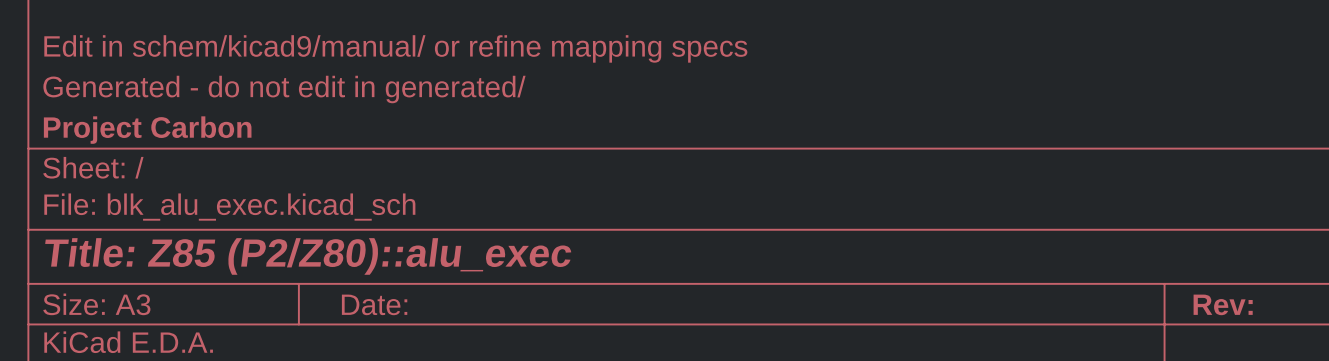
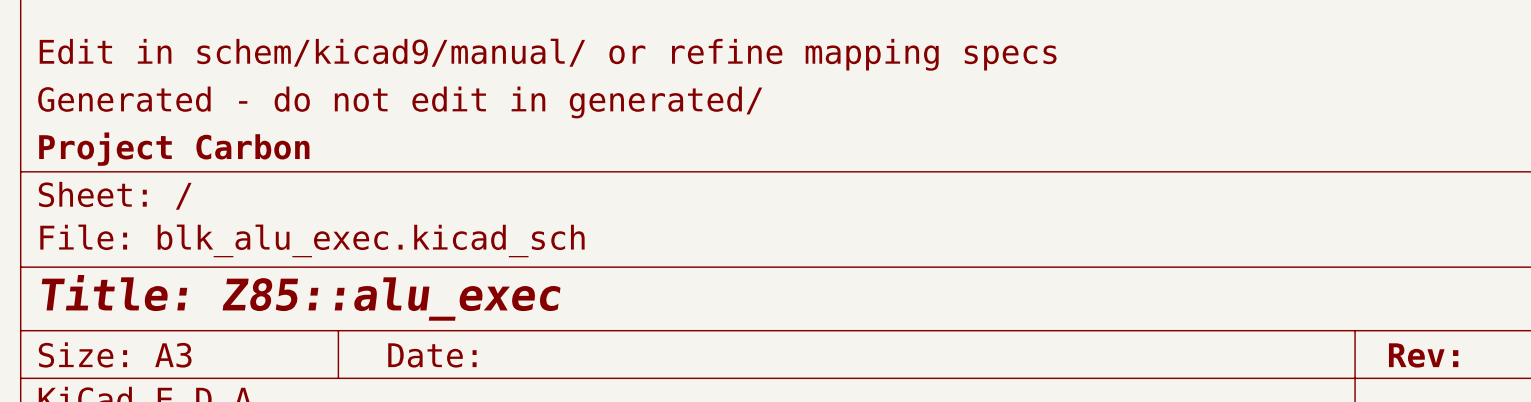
title block: Title: Z85 (P2/Z80)::alu_exec (308, 256) -> Title: Z85::alu_exec (301, 297)

